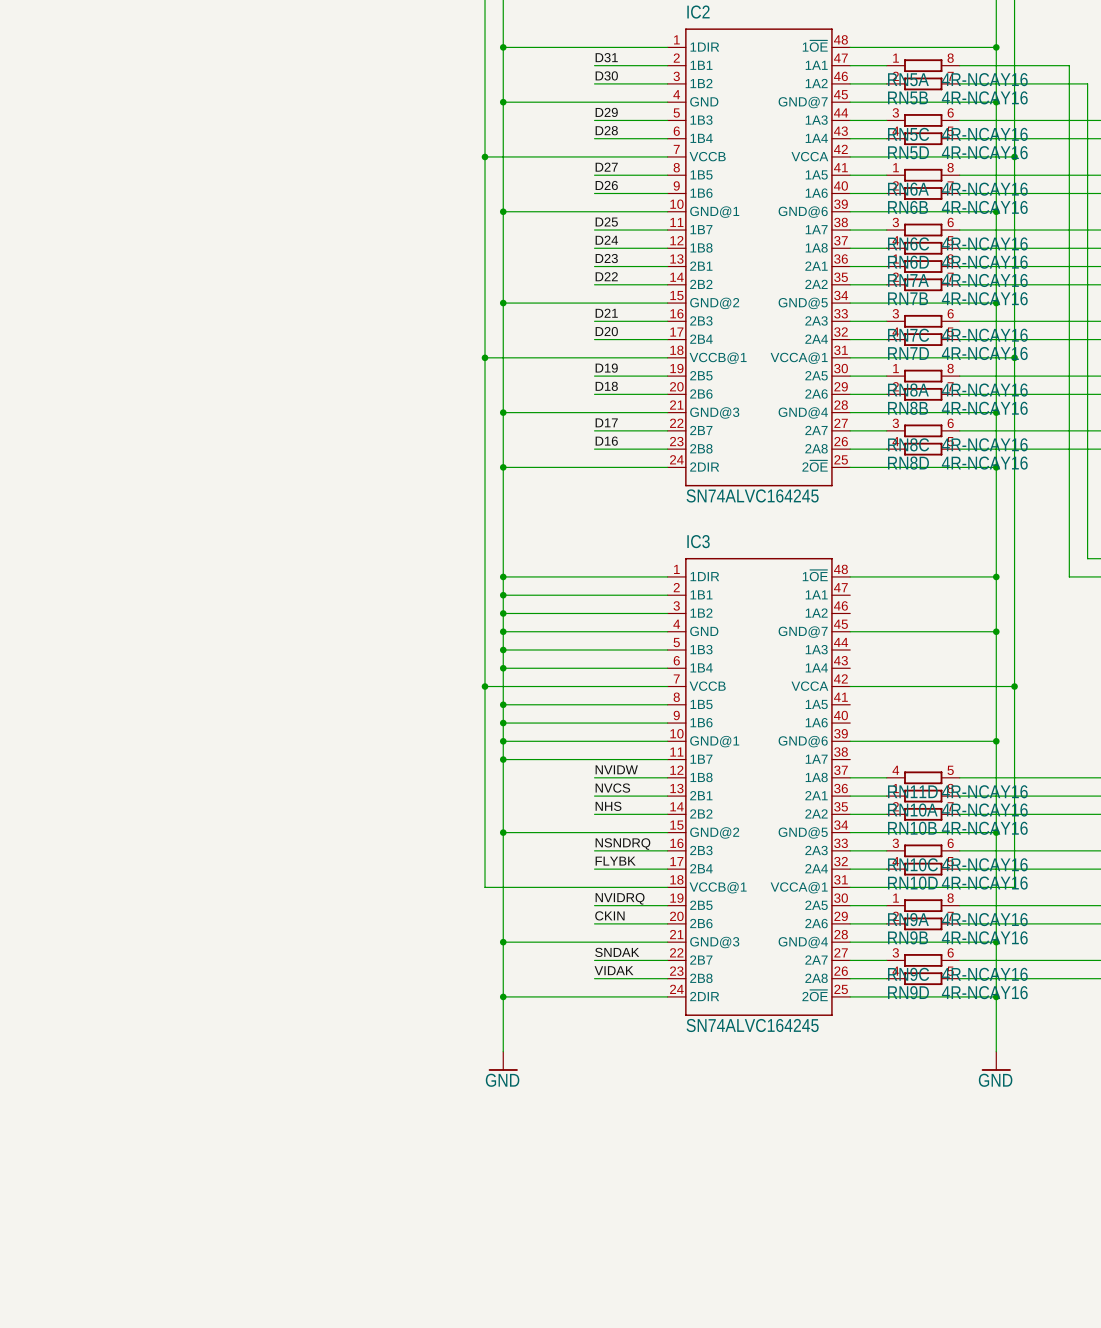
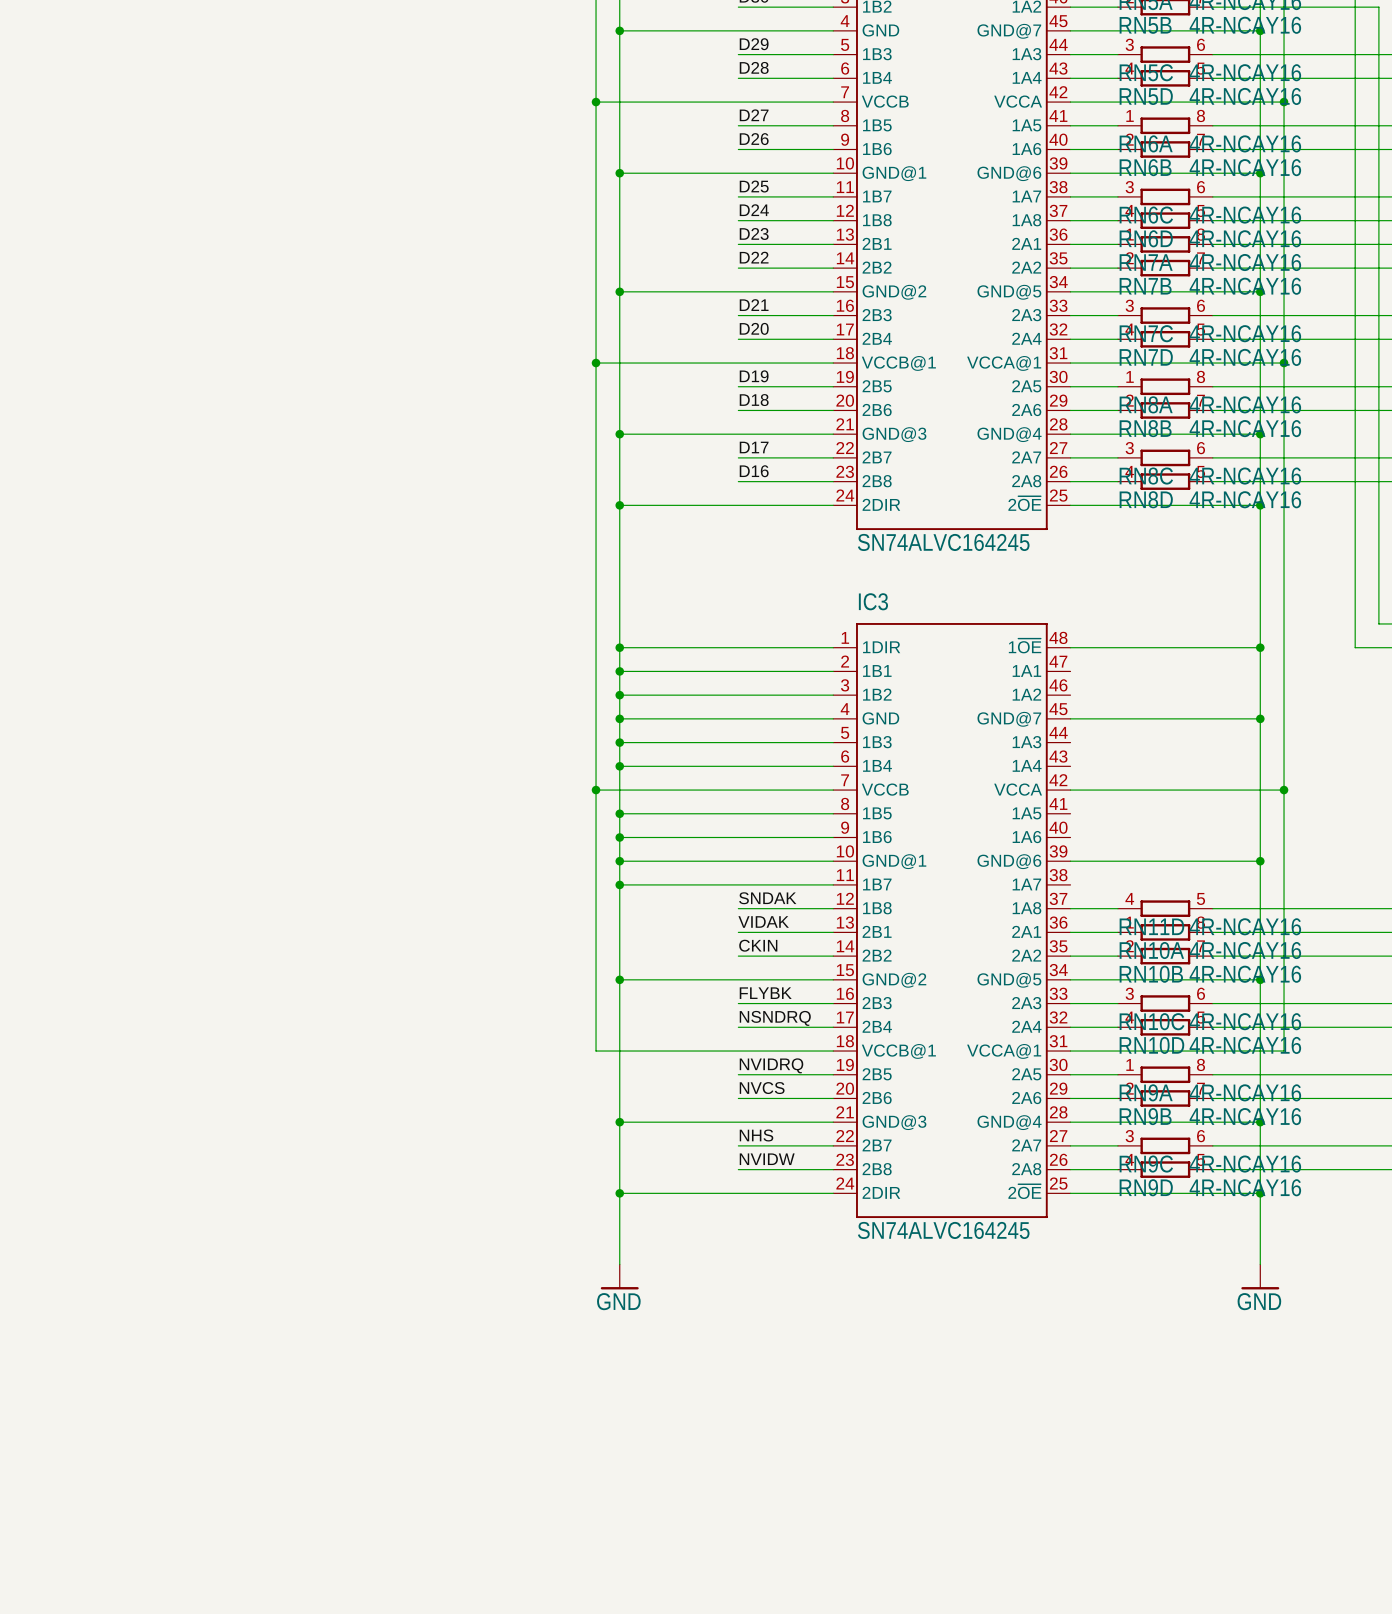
label: NVIDW (616, 769) -> SNDAK (767, 898)
label: NVCS (612, 788) -> VIDAK (763, 921)
label: NHS (608, 806) -> CKIN (758, 945)
label: NSNDRQ (622, 844) -> FLYBK (765, 993)
label: FLYBK (615, 861) -> NSNDRQ (775, 1018)
label: CKIN (609, 915) -> NVCS (762, 1088)
label: SNDAK (617, 952) -> NHS (756, 1135)
label: VIDAK (614, 970) -> NVIDW (767, 1159)

